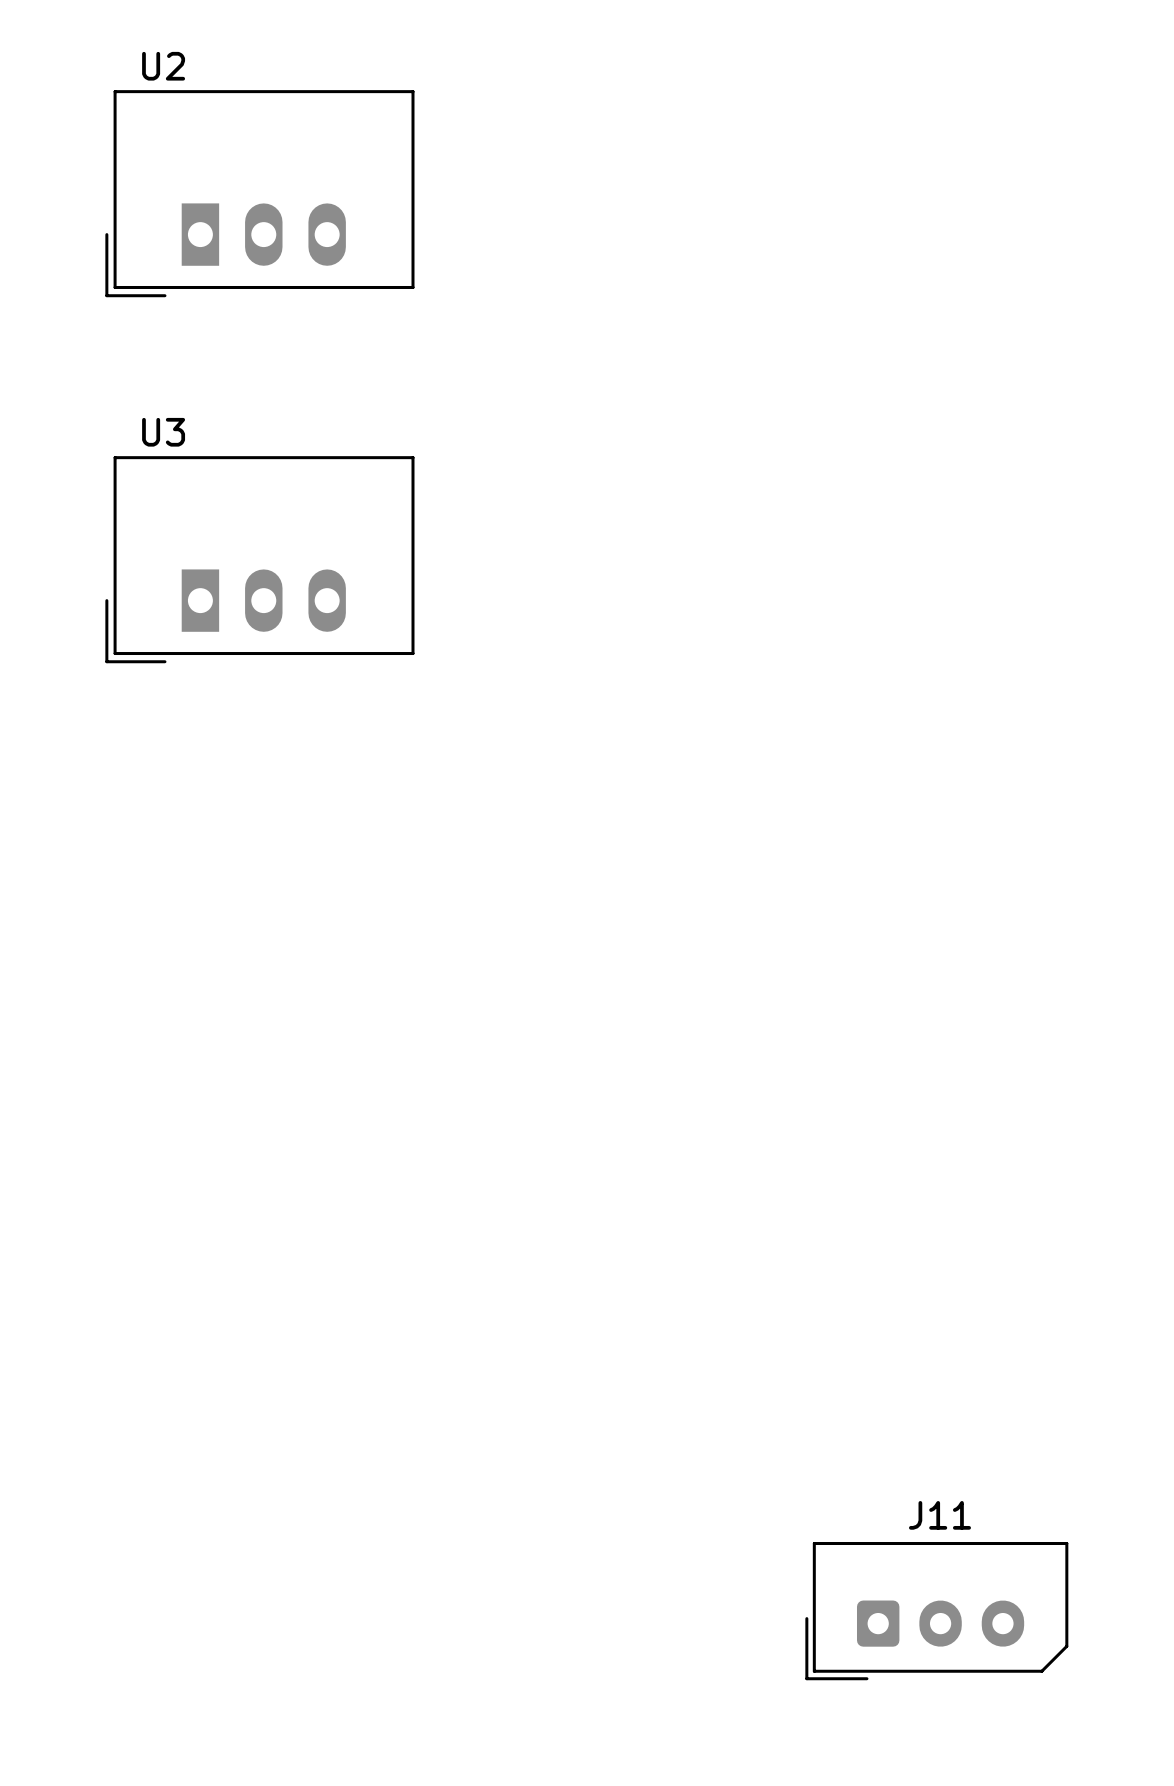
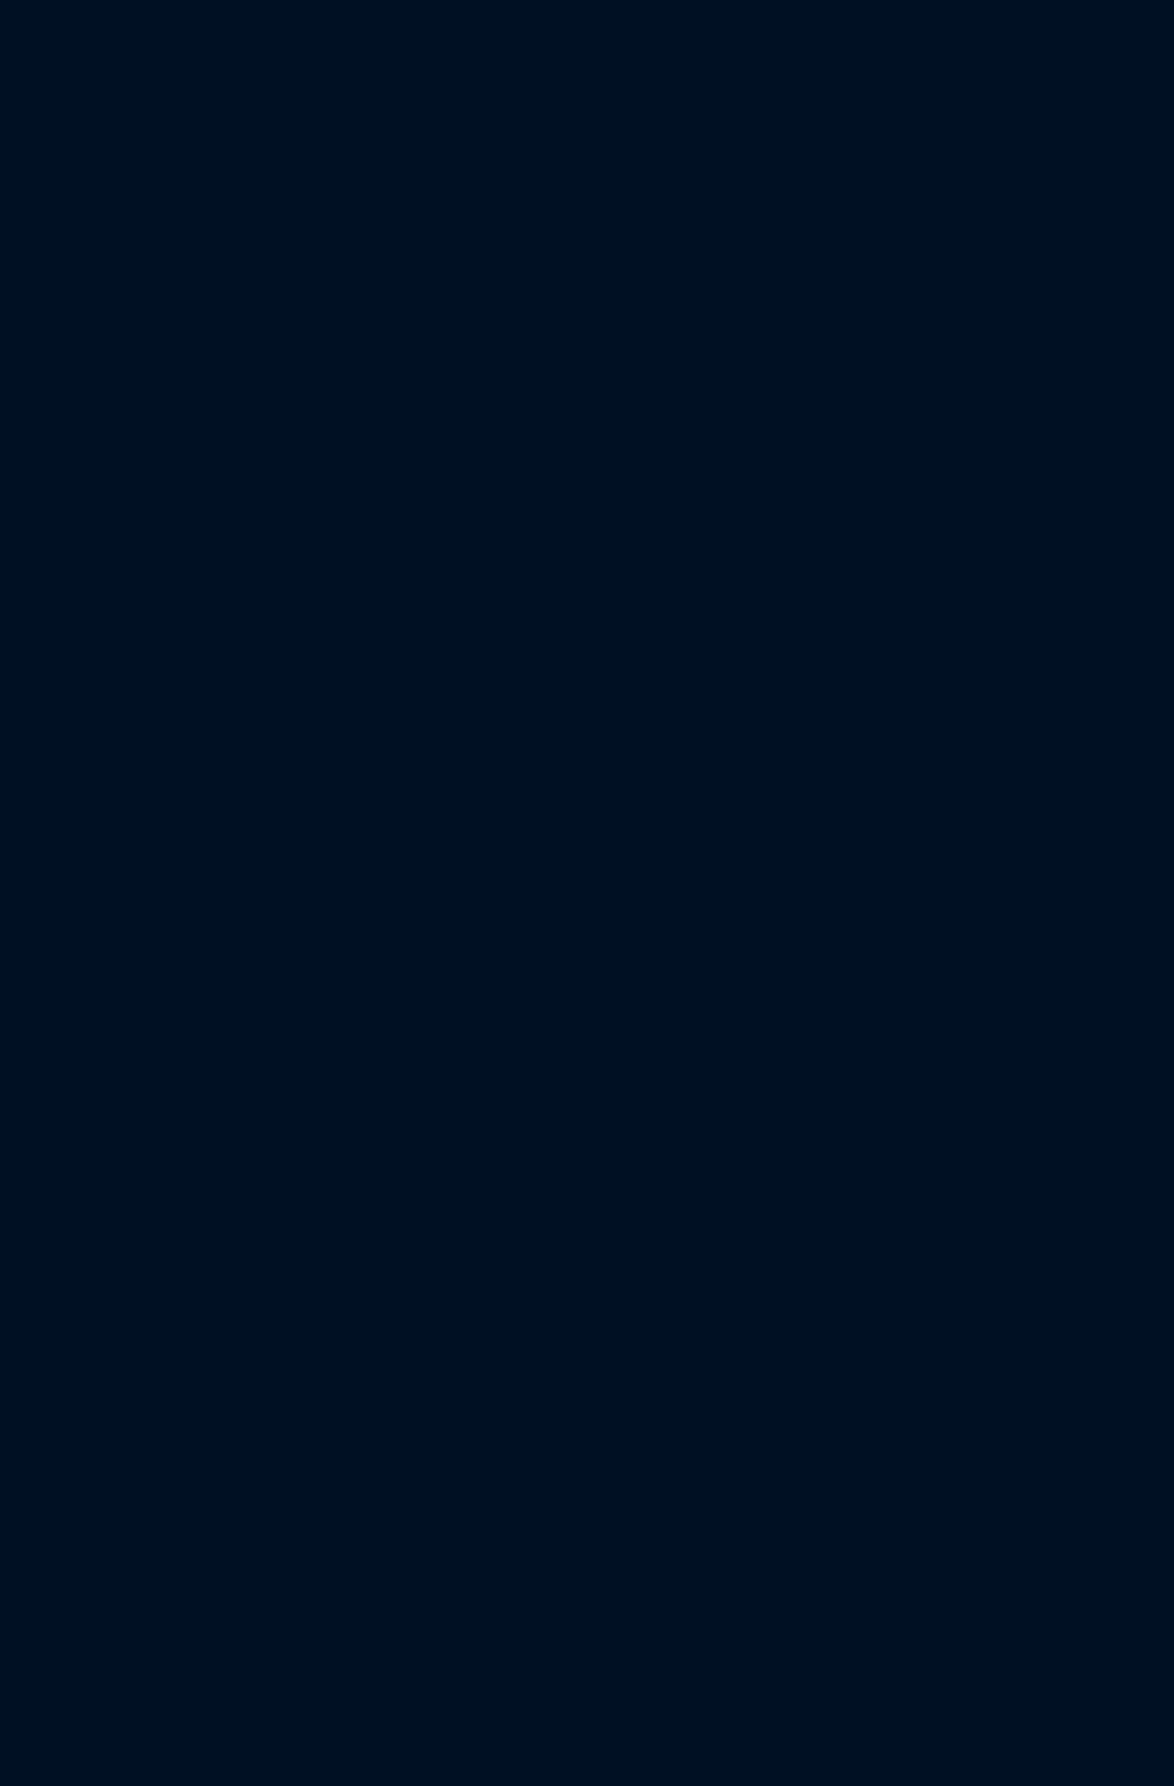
U2: (259, 193) -> none
U3: (259, 559) -> none
J11: (936, 1611) -> none

